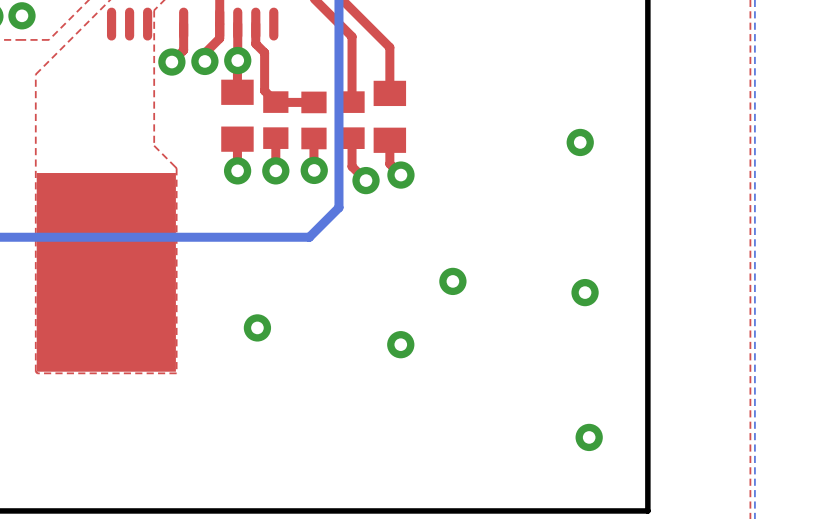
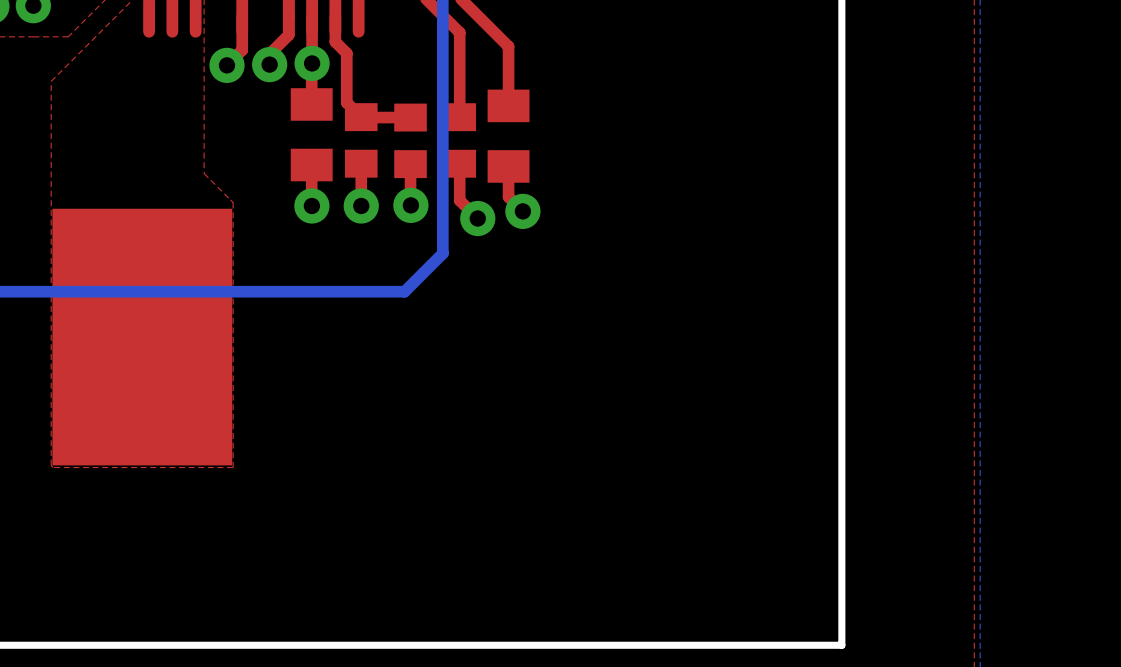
via: (580, 142) -> none
via: (452, 281) -> none
via: (585, 292) -> none
via: (257, 327) -> none
via: (400, 344) -> none
via: (589, 437) -> none

